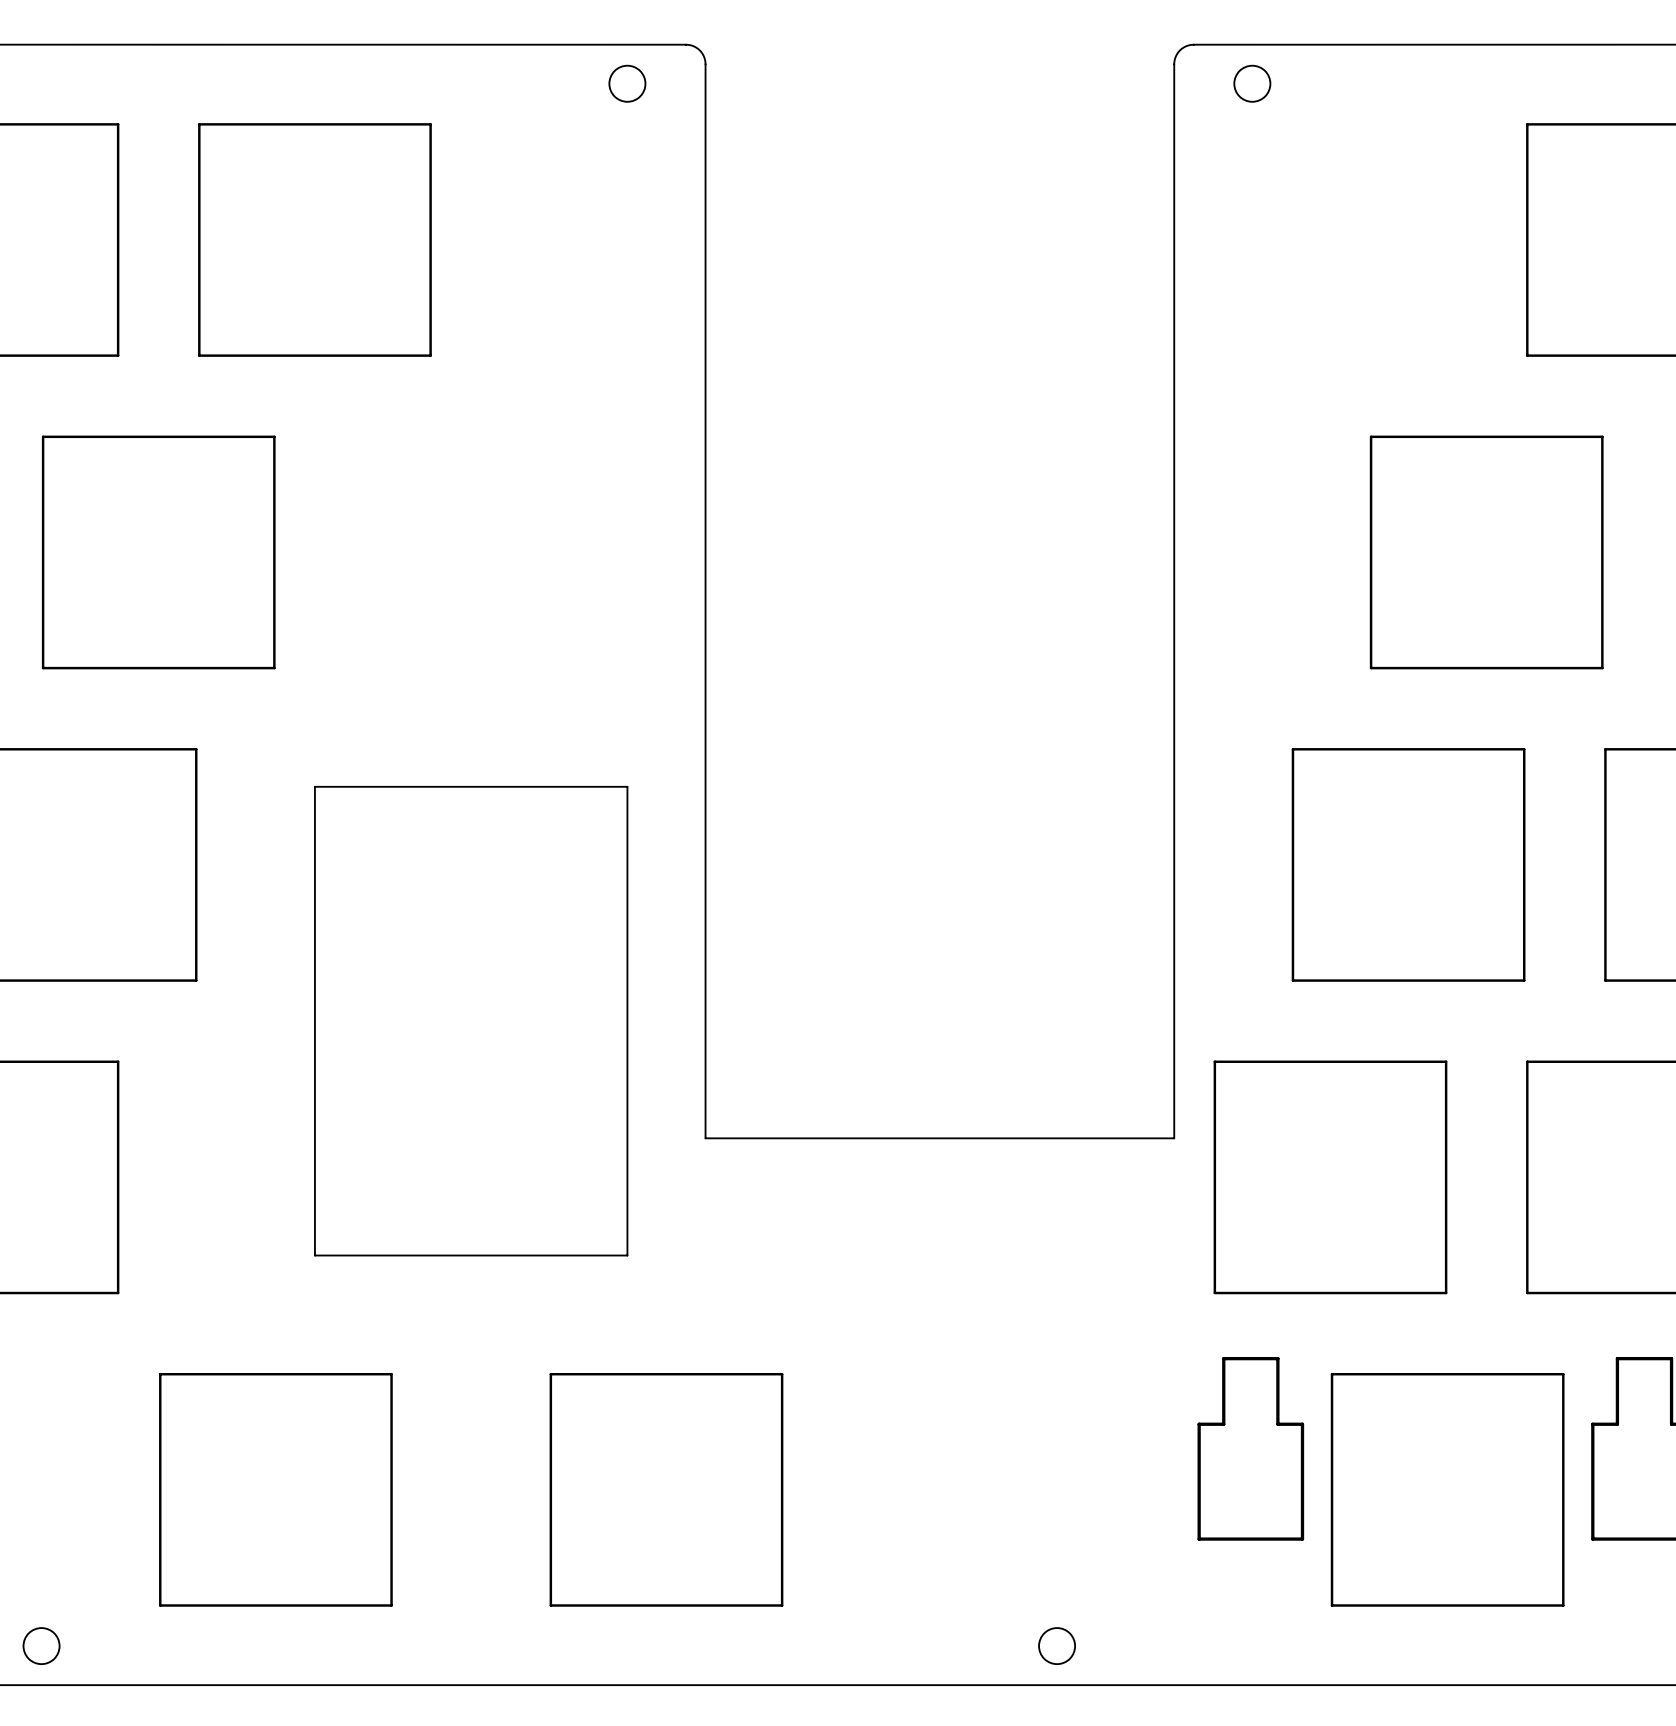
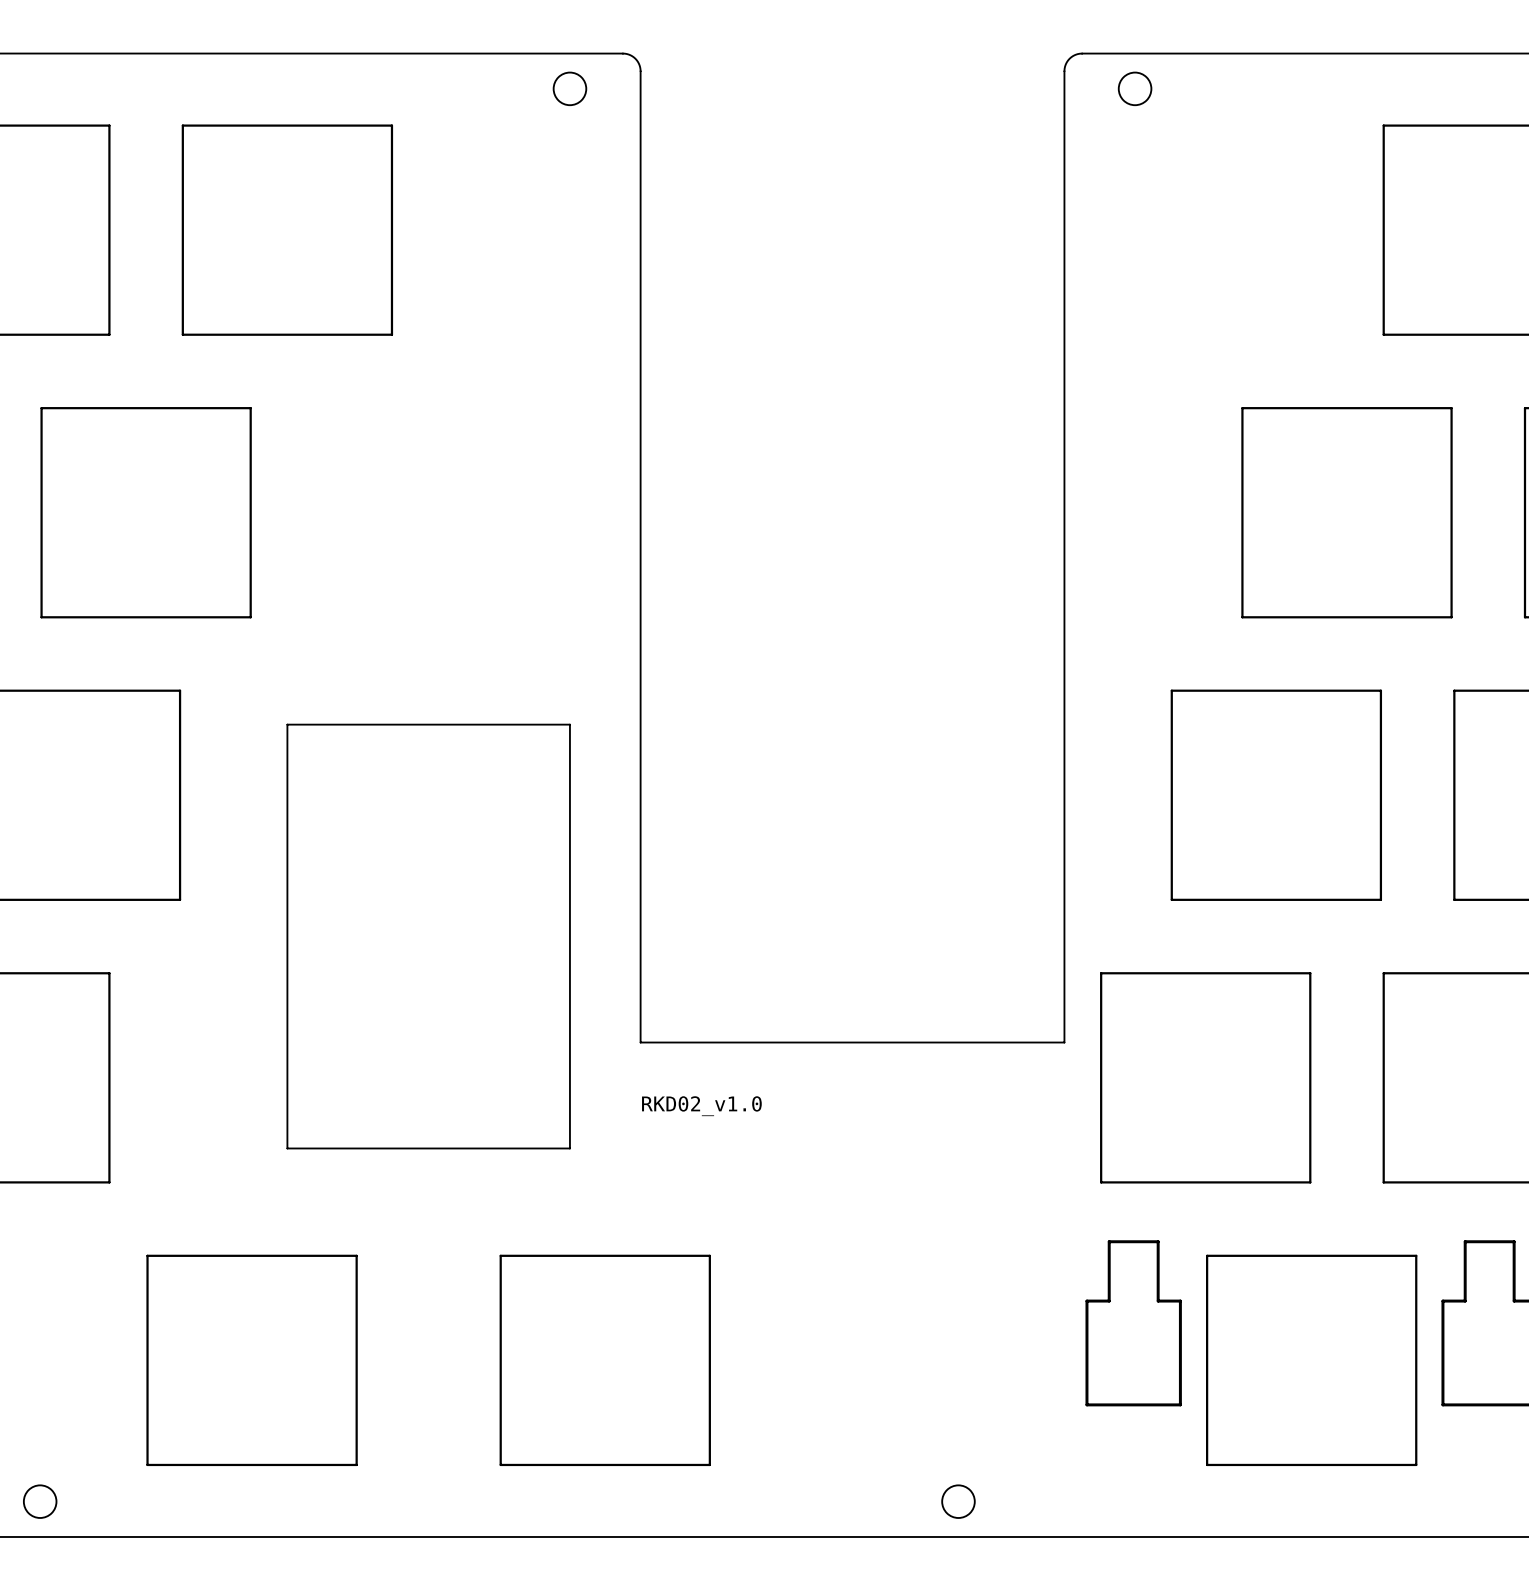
text: none -> RKD02_v1.0 (701, 1106)

